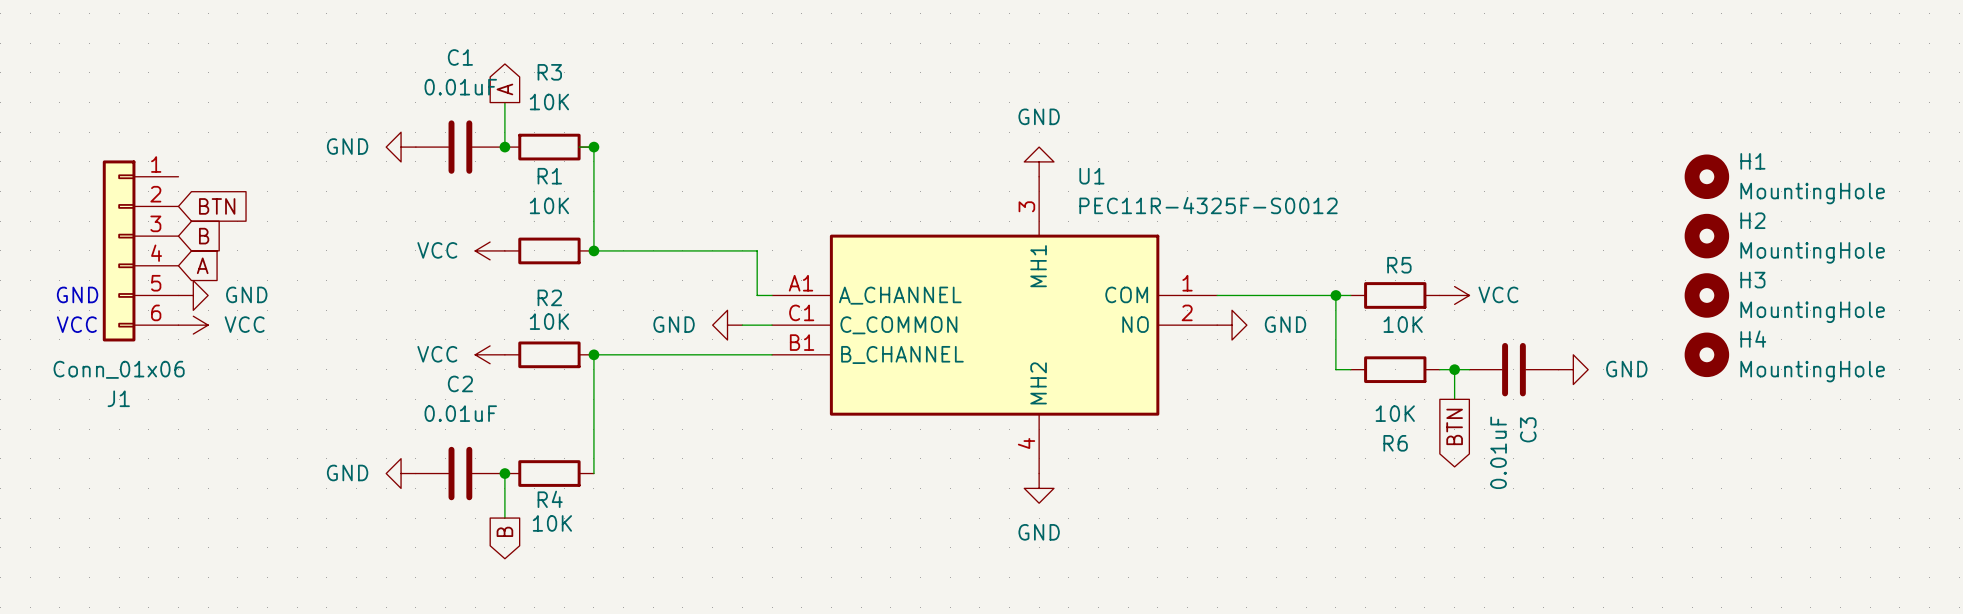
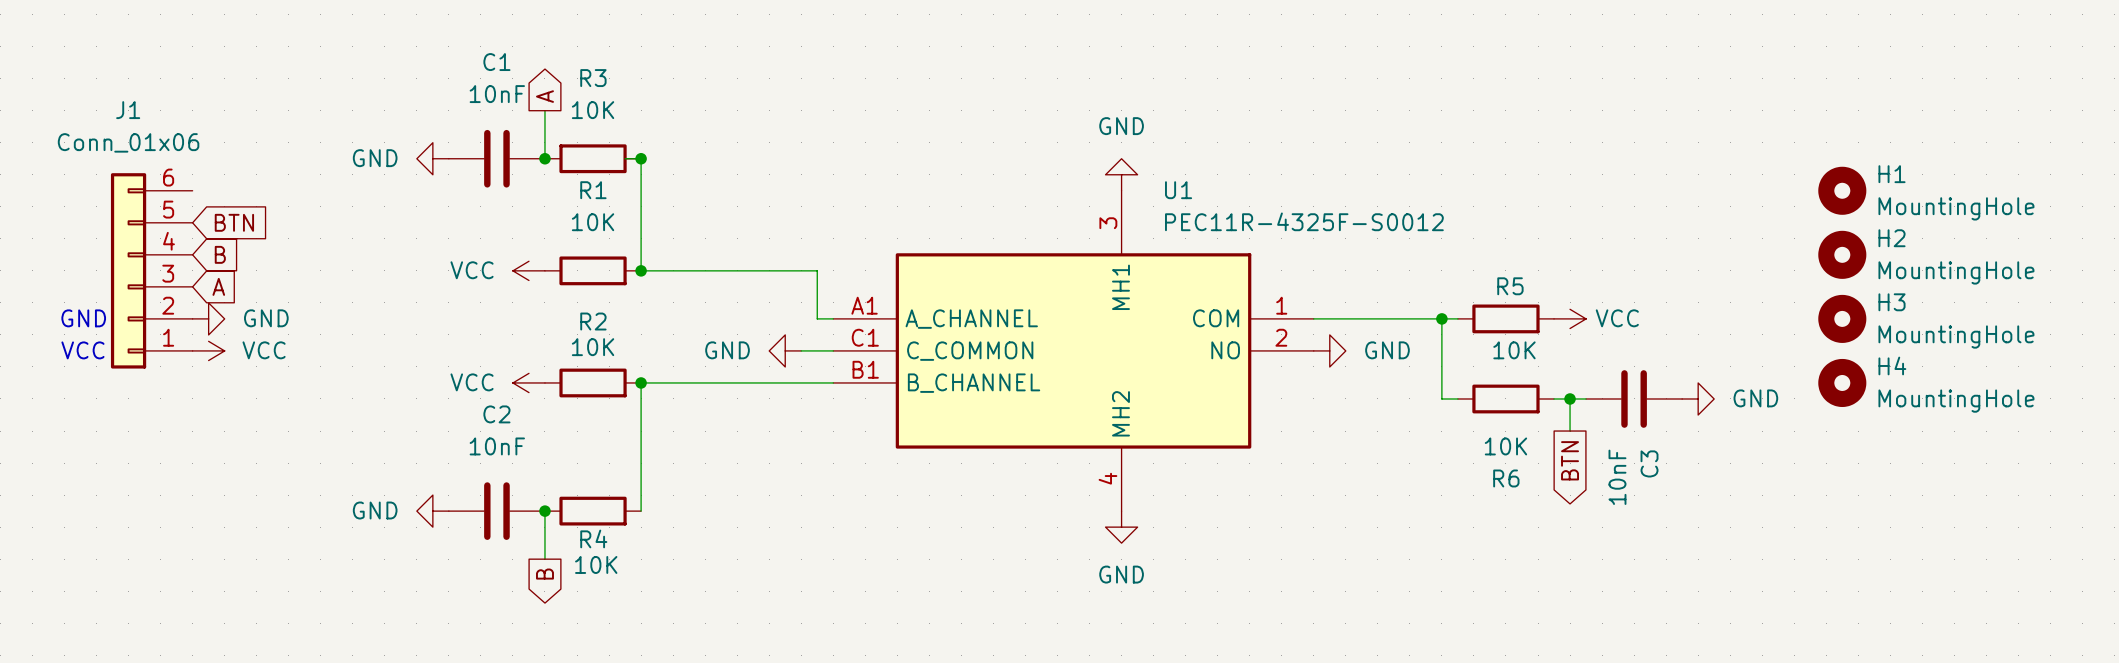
C1 value: 0.01uF (460, 87) -> 10nF (497, 94)
J1 flip: as is (119, 250) -> up-down (128, 270)
C2 value: 0.01uF (460, 413) -> 10nF (497, 446)
C3 value: 0.01uF (1498, 452) -> 10nF (1617, 477)

